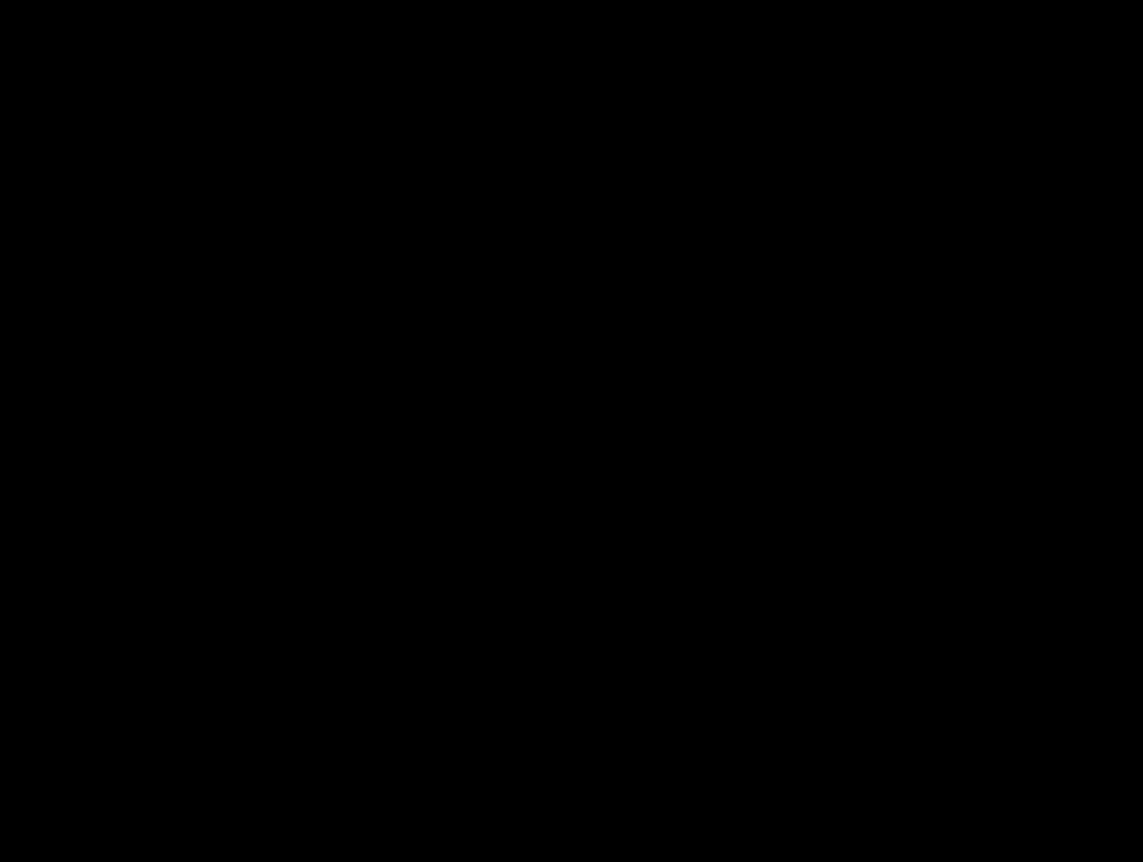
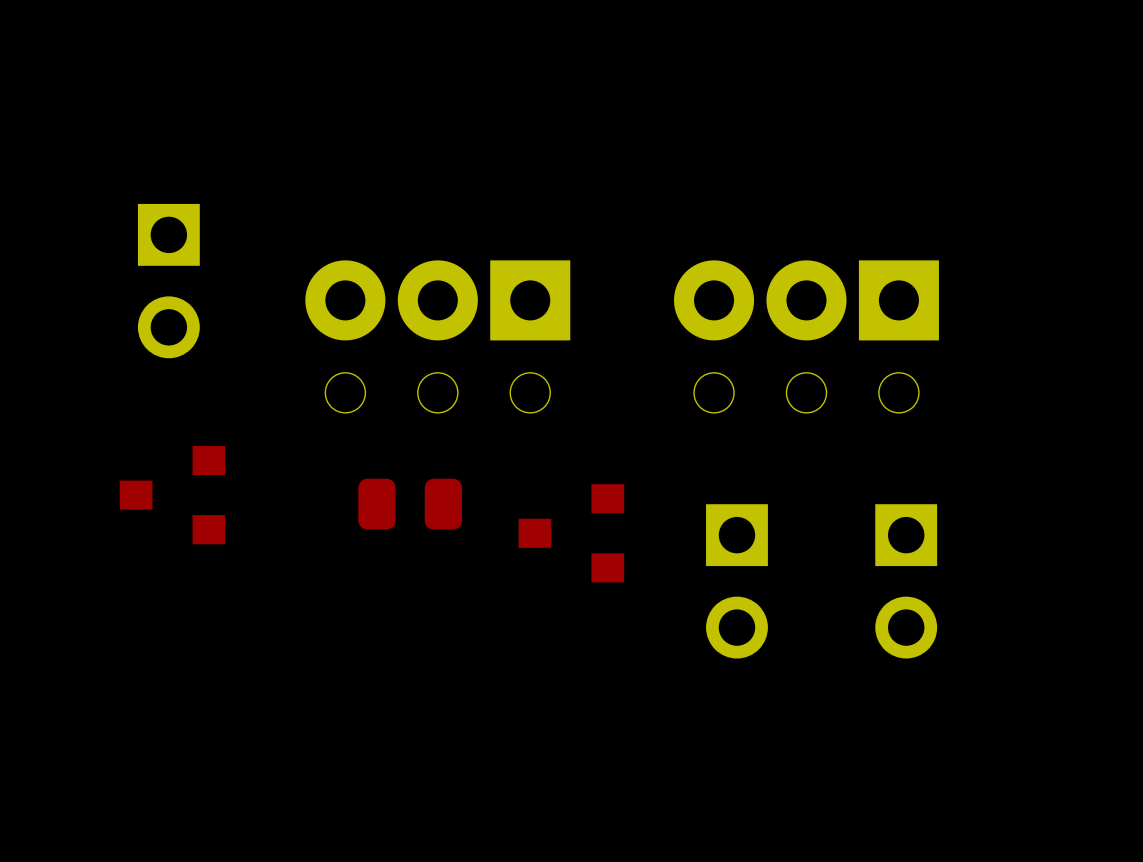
part: none -> (168, 281)
part: none -> (437, 336)
part: none -> (806, 336)
part: none -> (172, 495)
part: none -> (410, 504)
part: none -> (571, 533)
part: none -> (736, 581)
part: none -> (906, 581)

